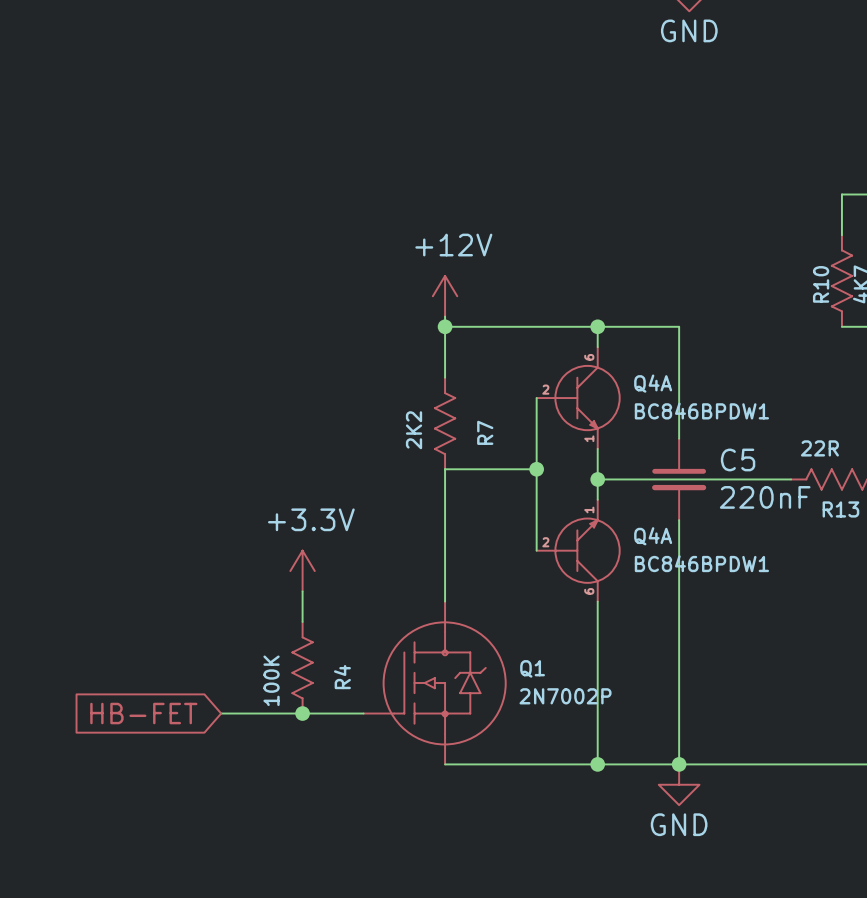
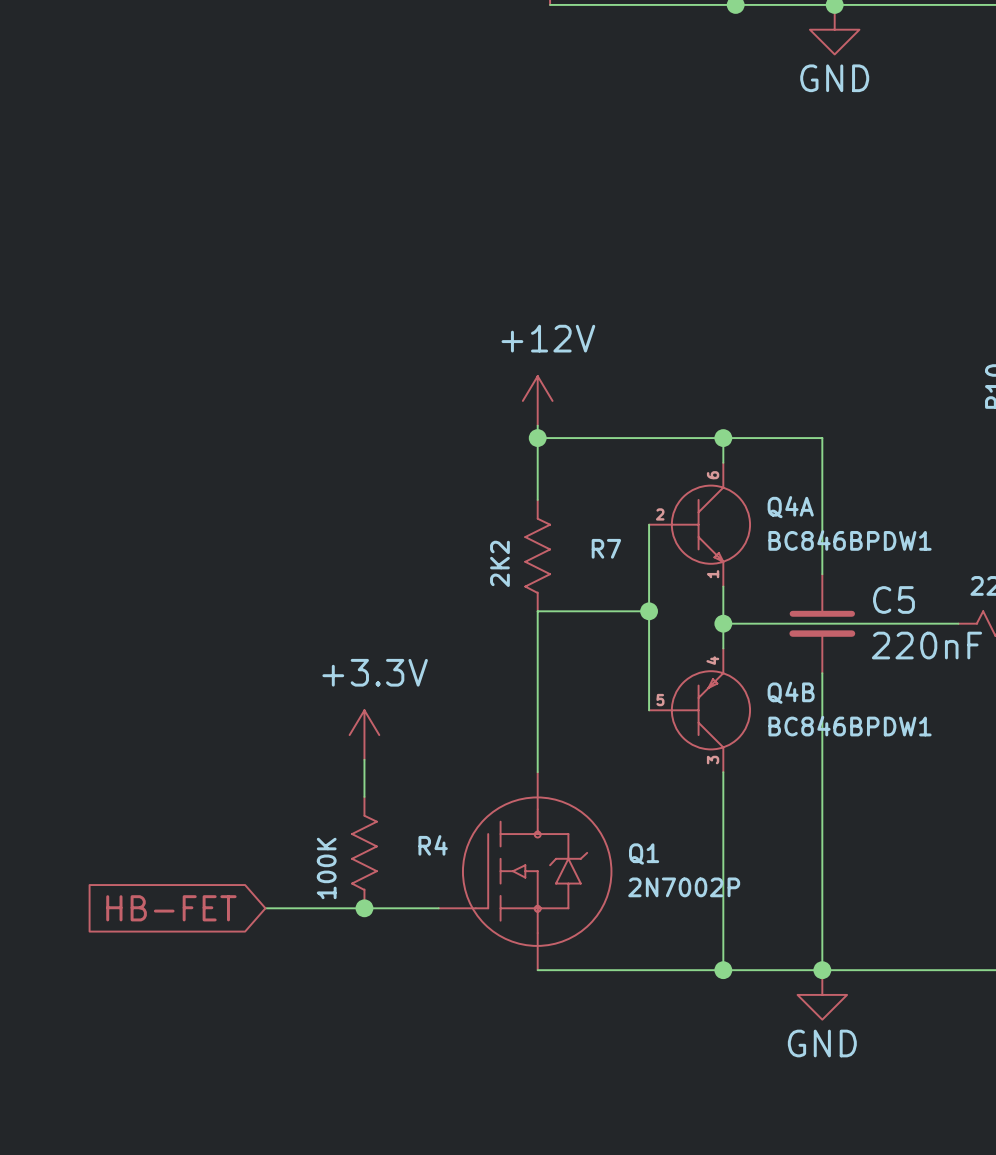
R7 name rotation: 0° (485, 432) -> 90° clockwise (606, 548)
Q4A: BC846BPDW1 (578, 550) -> none
Q4B: none -> BC846BPDW1 (699, 710)
R4 name rotation: 0° (342, 677) -> 90° clockwise (433, 845)

